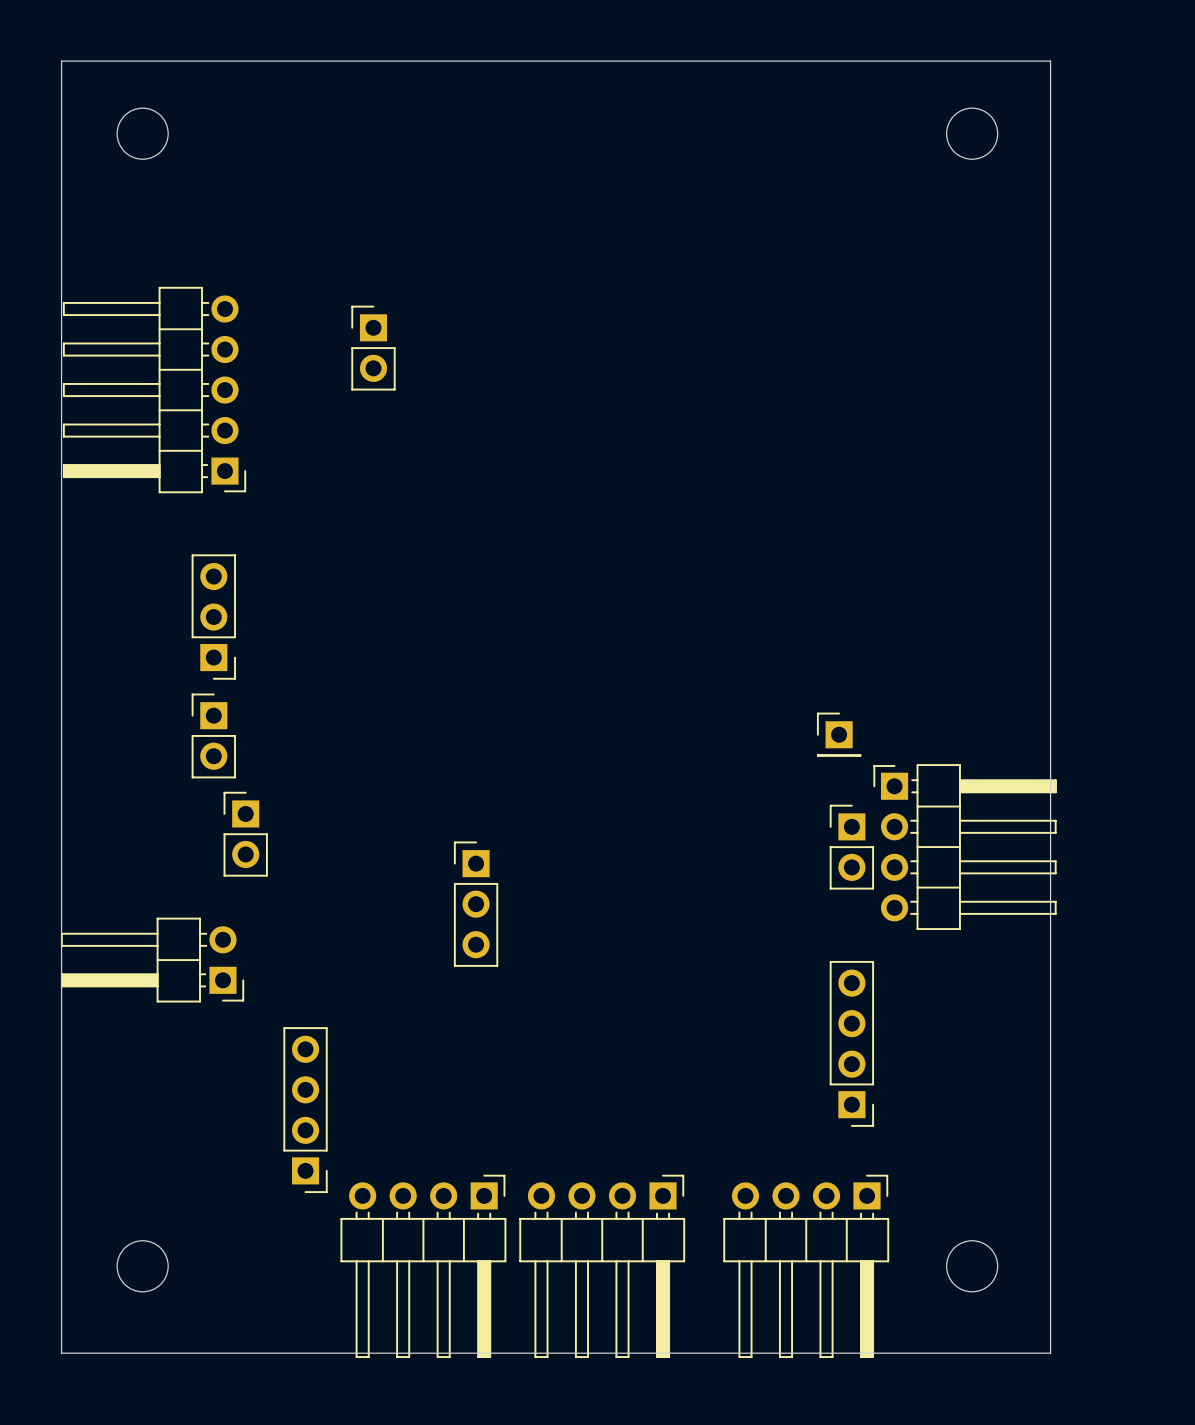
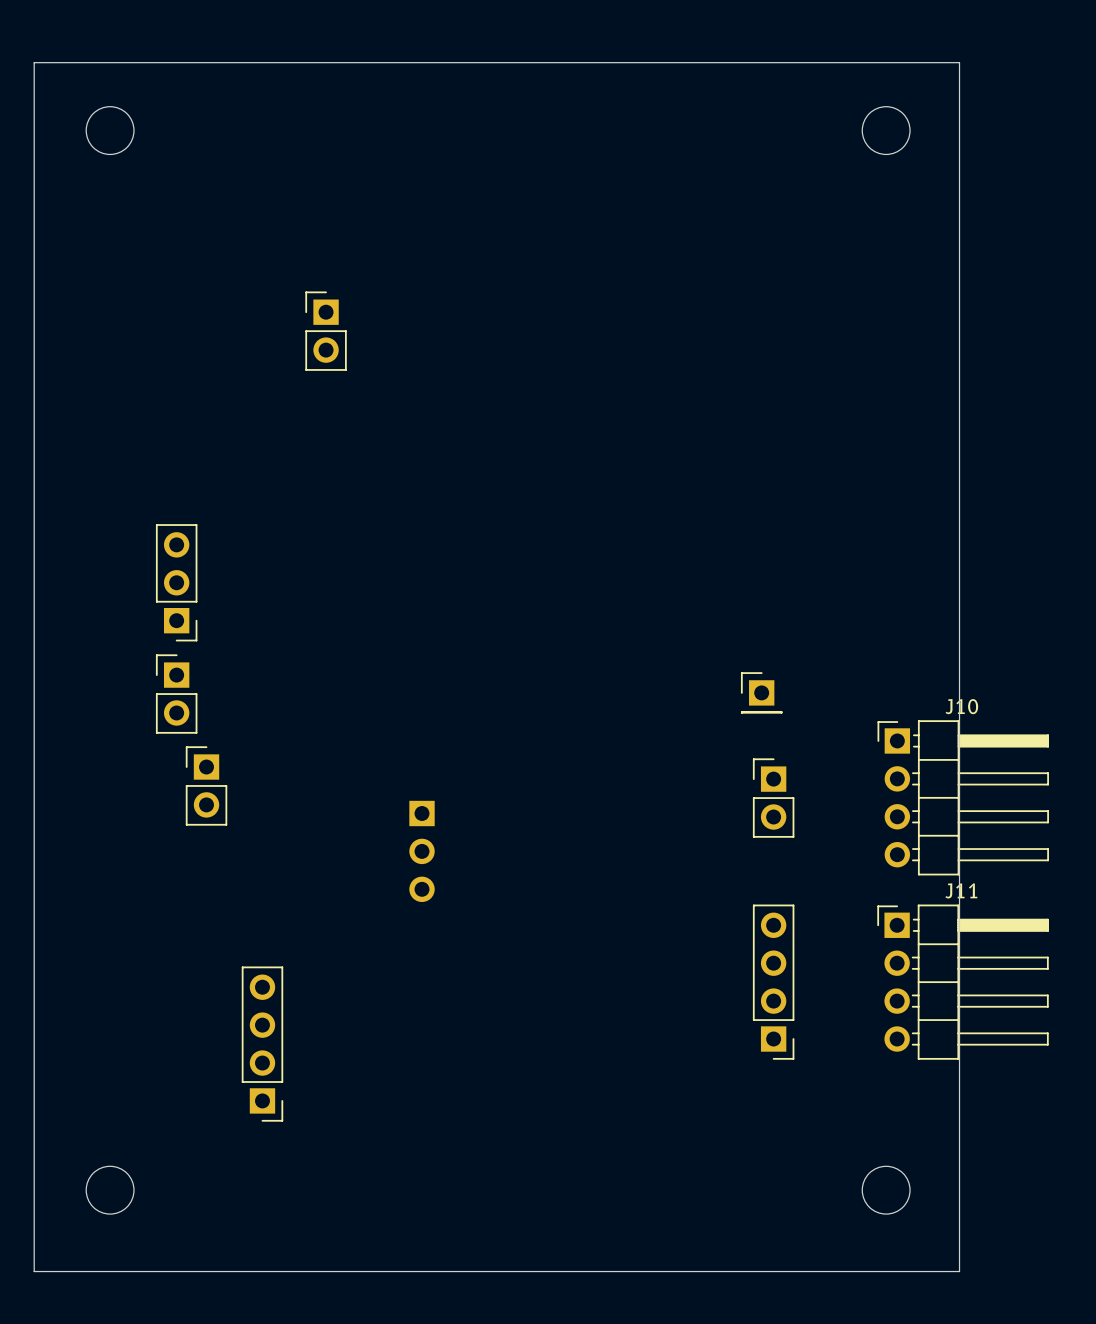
part: (154, 390) -> none
J10: none -> (963, 797)
part: (964, 847) -> none
part side: top (476, 904) -> bottom (422, 851)
part: (152, 960) -> none
J11: none -> (963, 982)
part: (423, 1266) -> none
part: (602, 1266) -> none
part: (806, 1266) -> none

